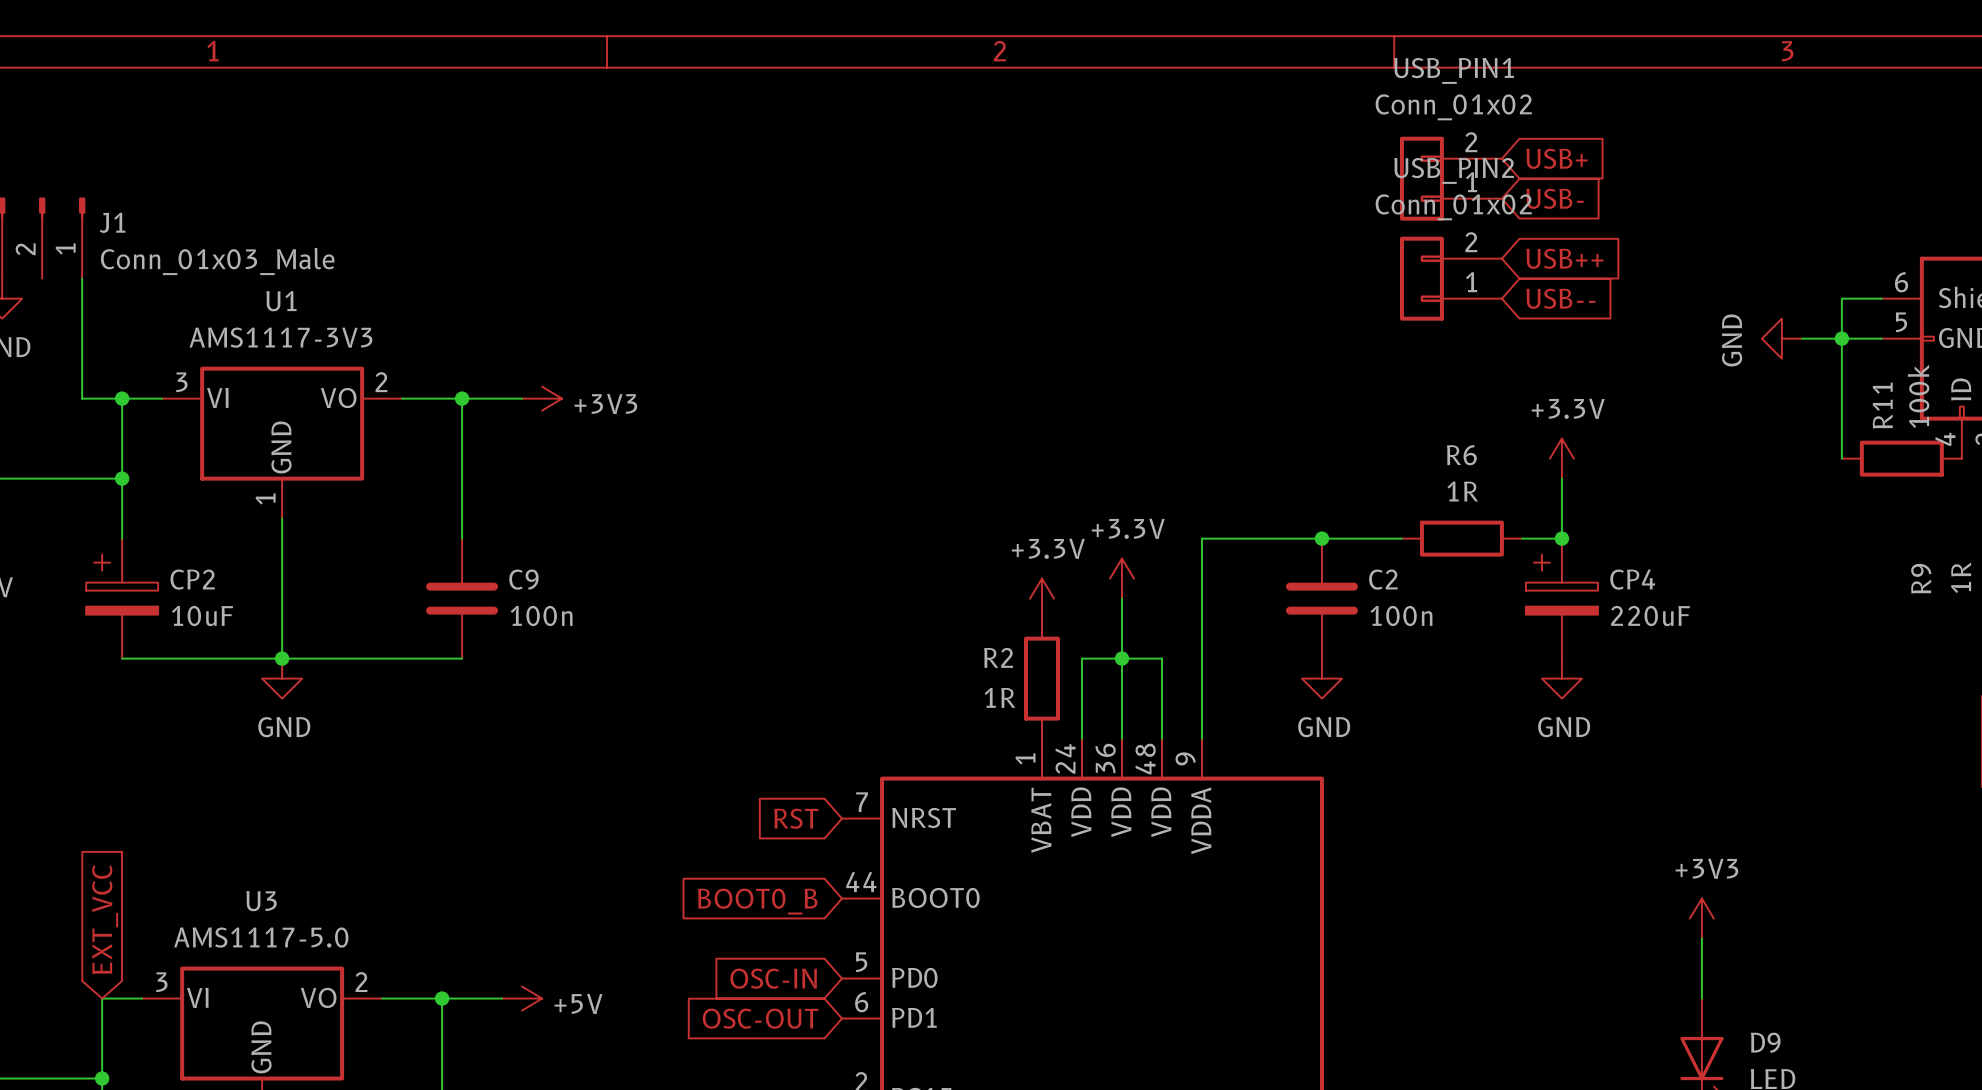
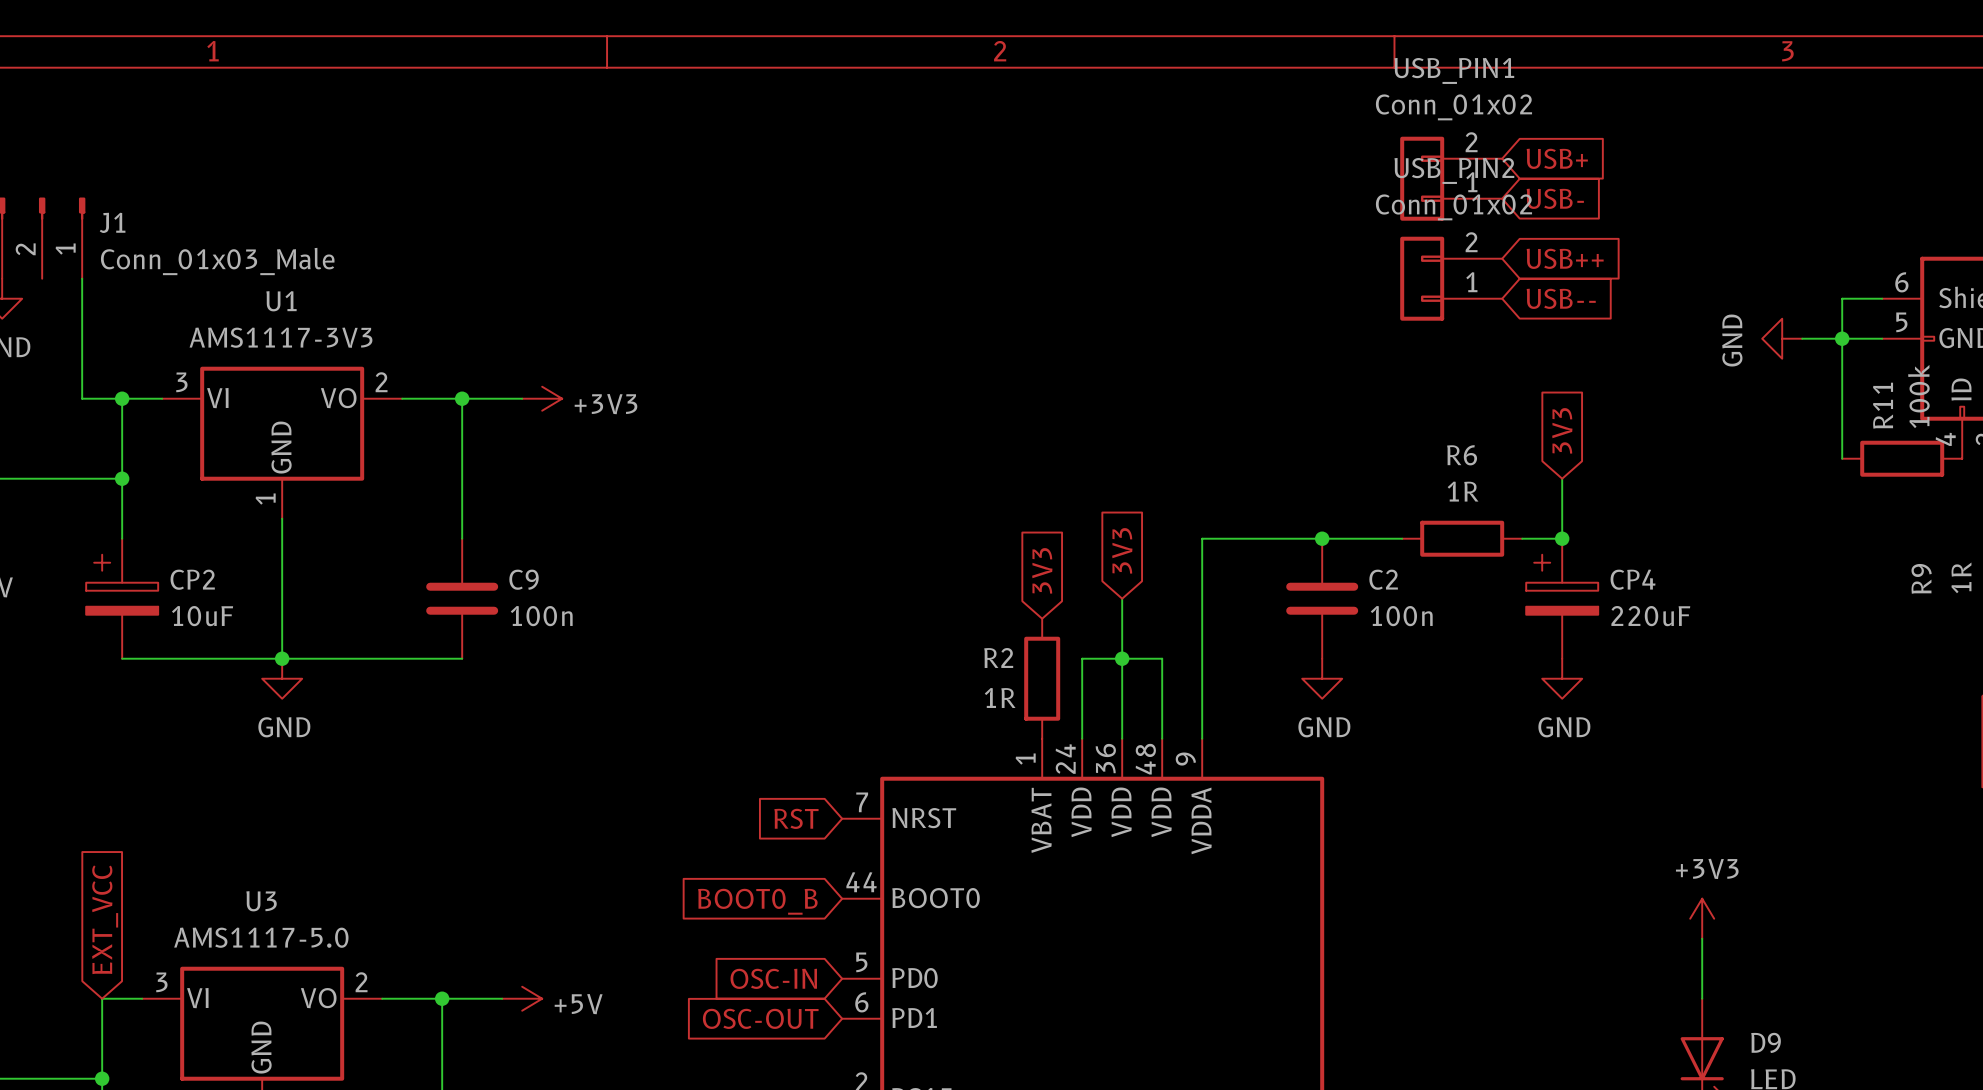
global label: none -> 3V3 (1562, 430)
power symbol: +3.3V (1561, 458) -> none
global label: none -> 3V3 (1122, 550)
global label: none -> 3V3 (1042, 570)
power symbol: +3.3V (1121, 578) -> none
power symbol: +3.3V (1042, 598) -> none

